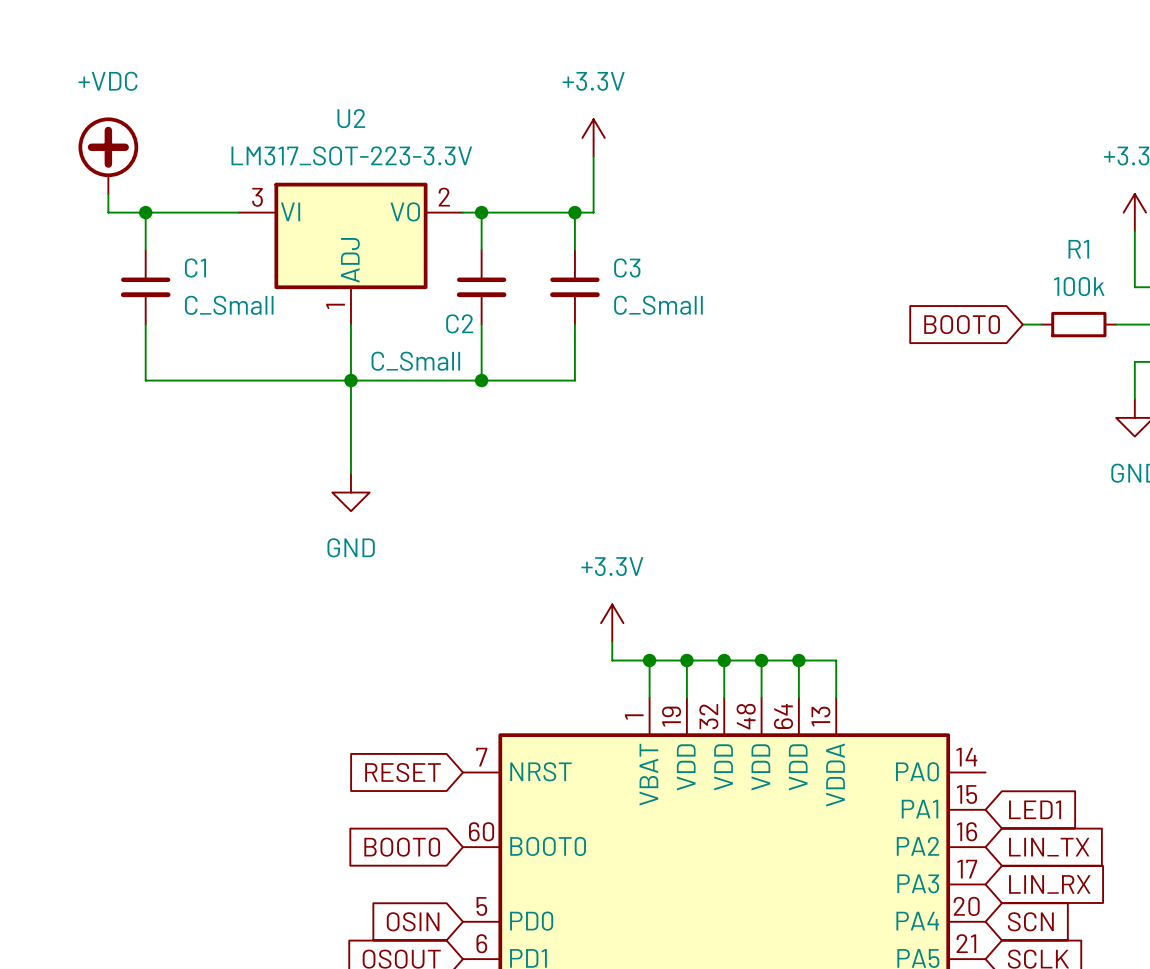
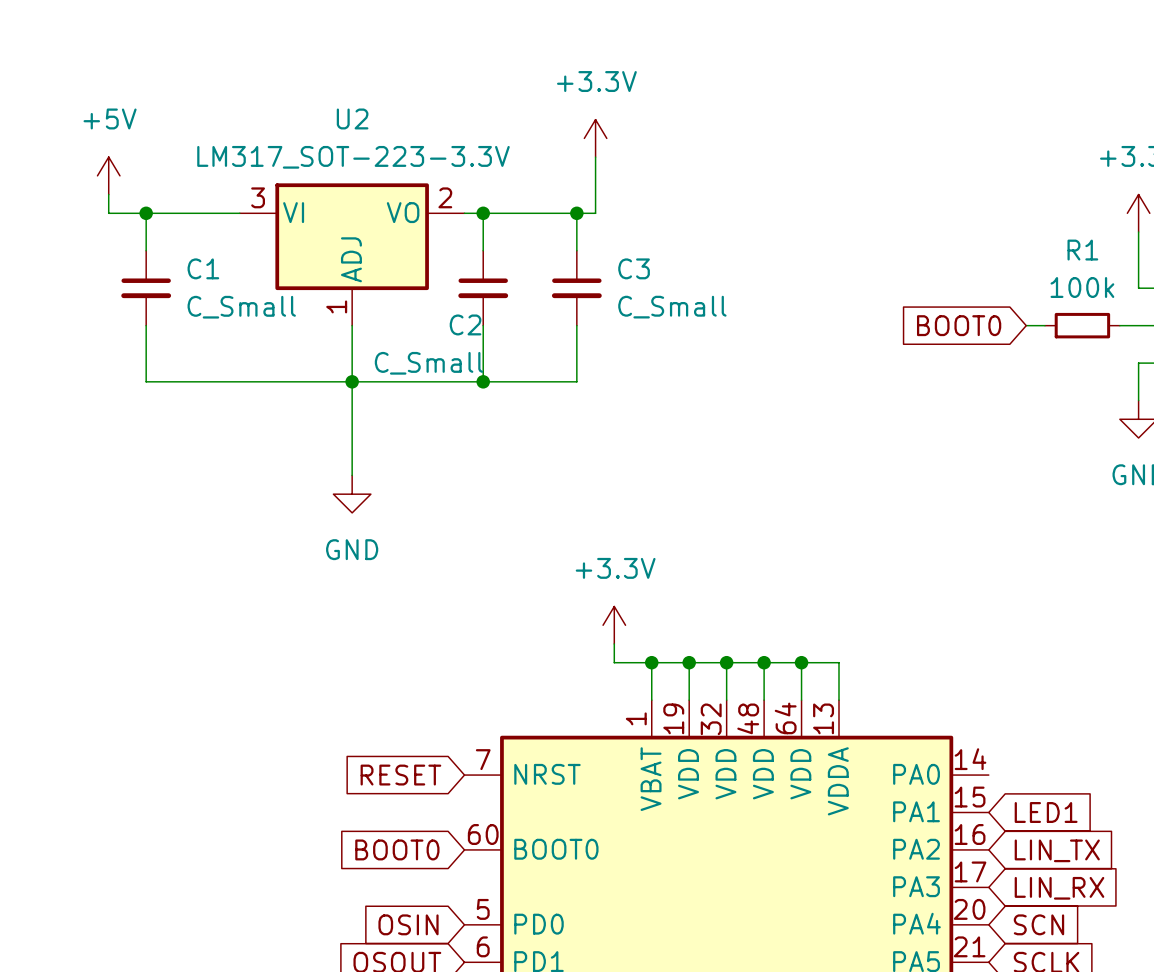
power symbol: +VDC (108, 155) -> none
power symbol: none -> +5V (108, 175)

